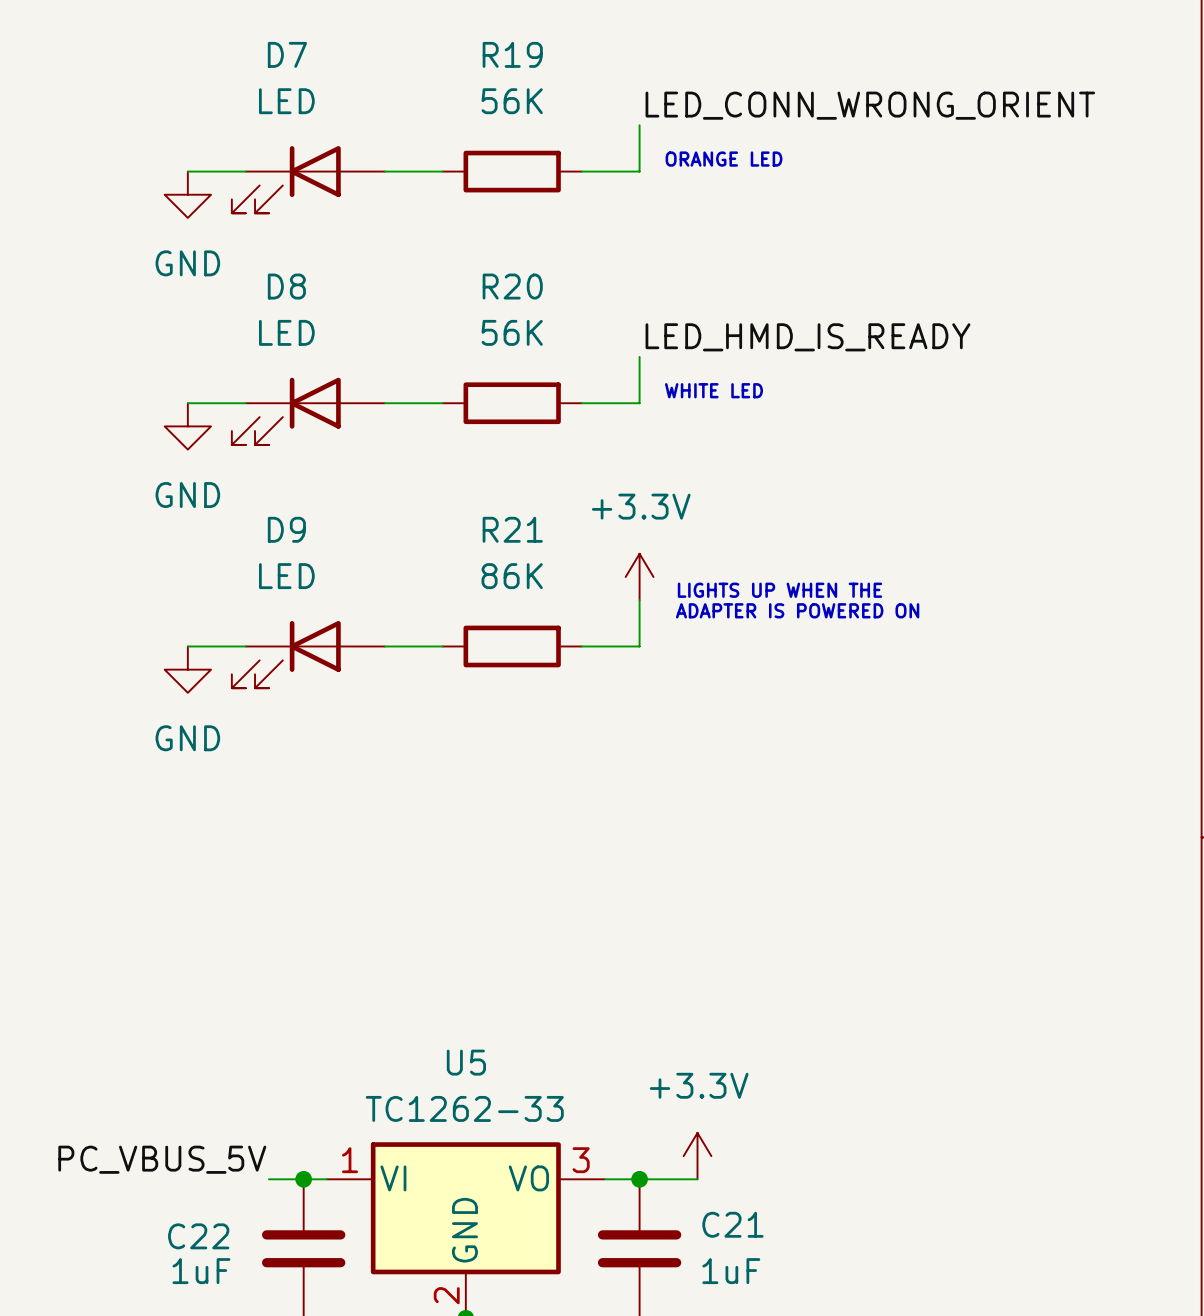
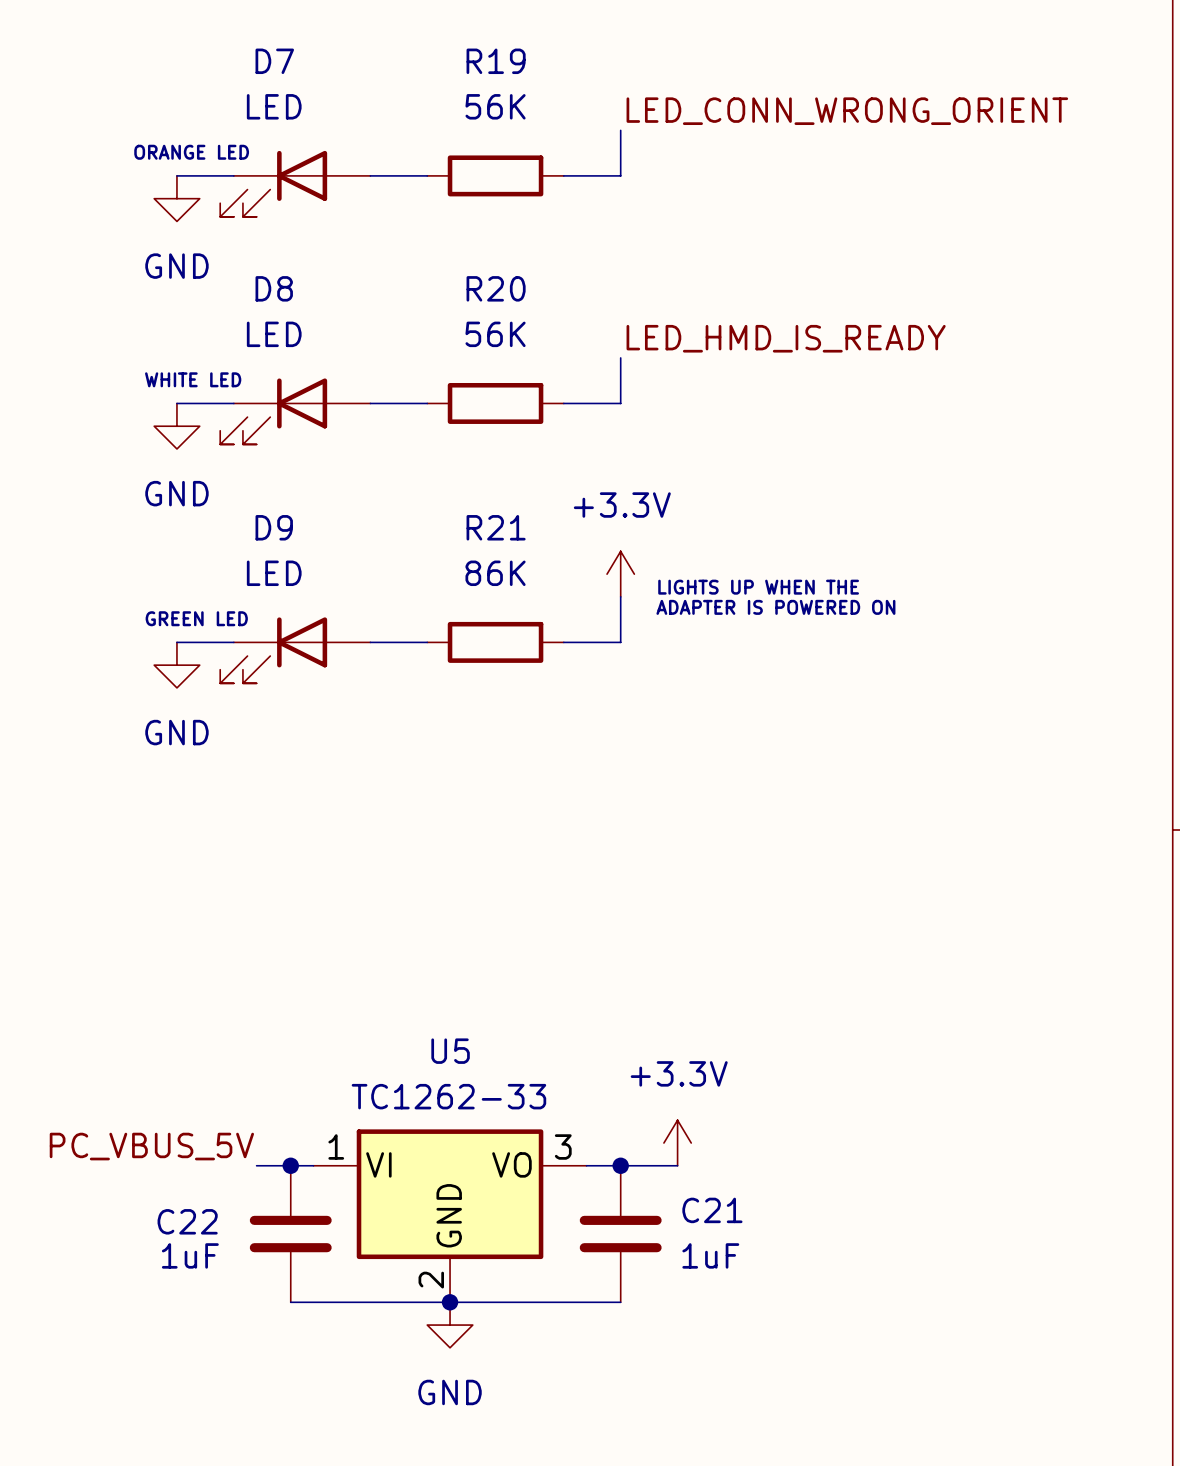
text: none -> ORANGE LED (191, 152)
text: ORANGE LED (724, 159) -> none
text: none -> WHITE LED (193, 379)
text: WHITE LED (713, 390) -> none
text: none -> GREEN LED (196, 618)

